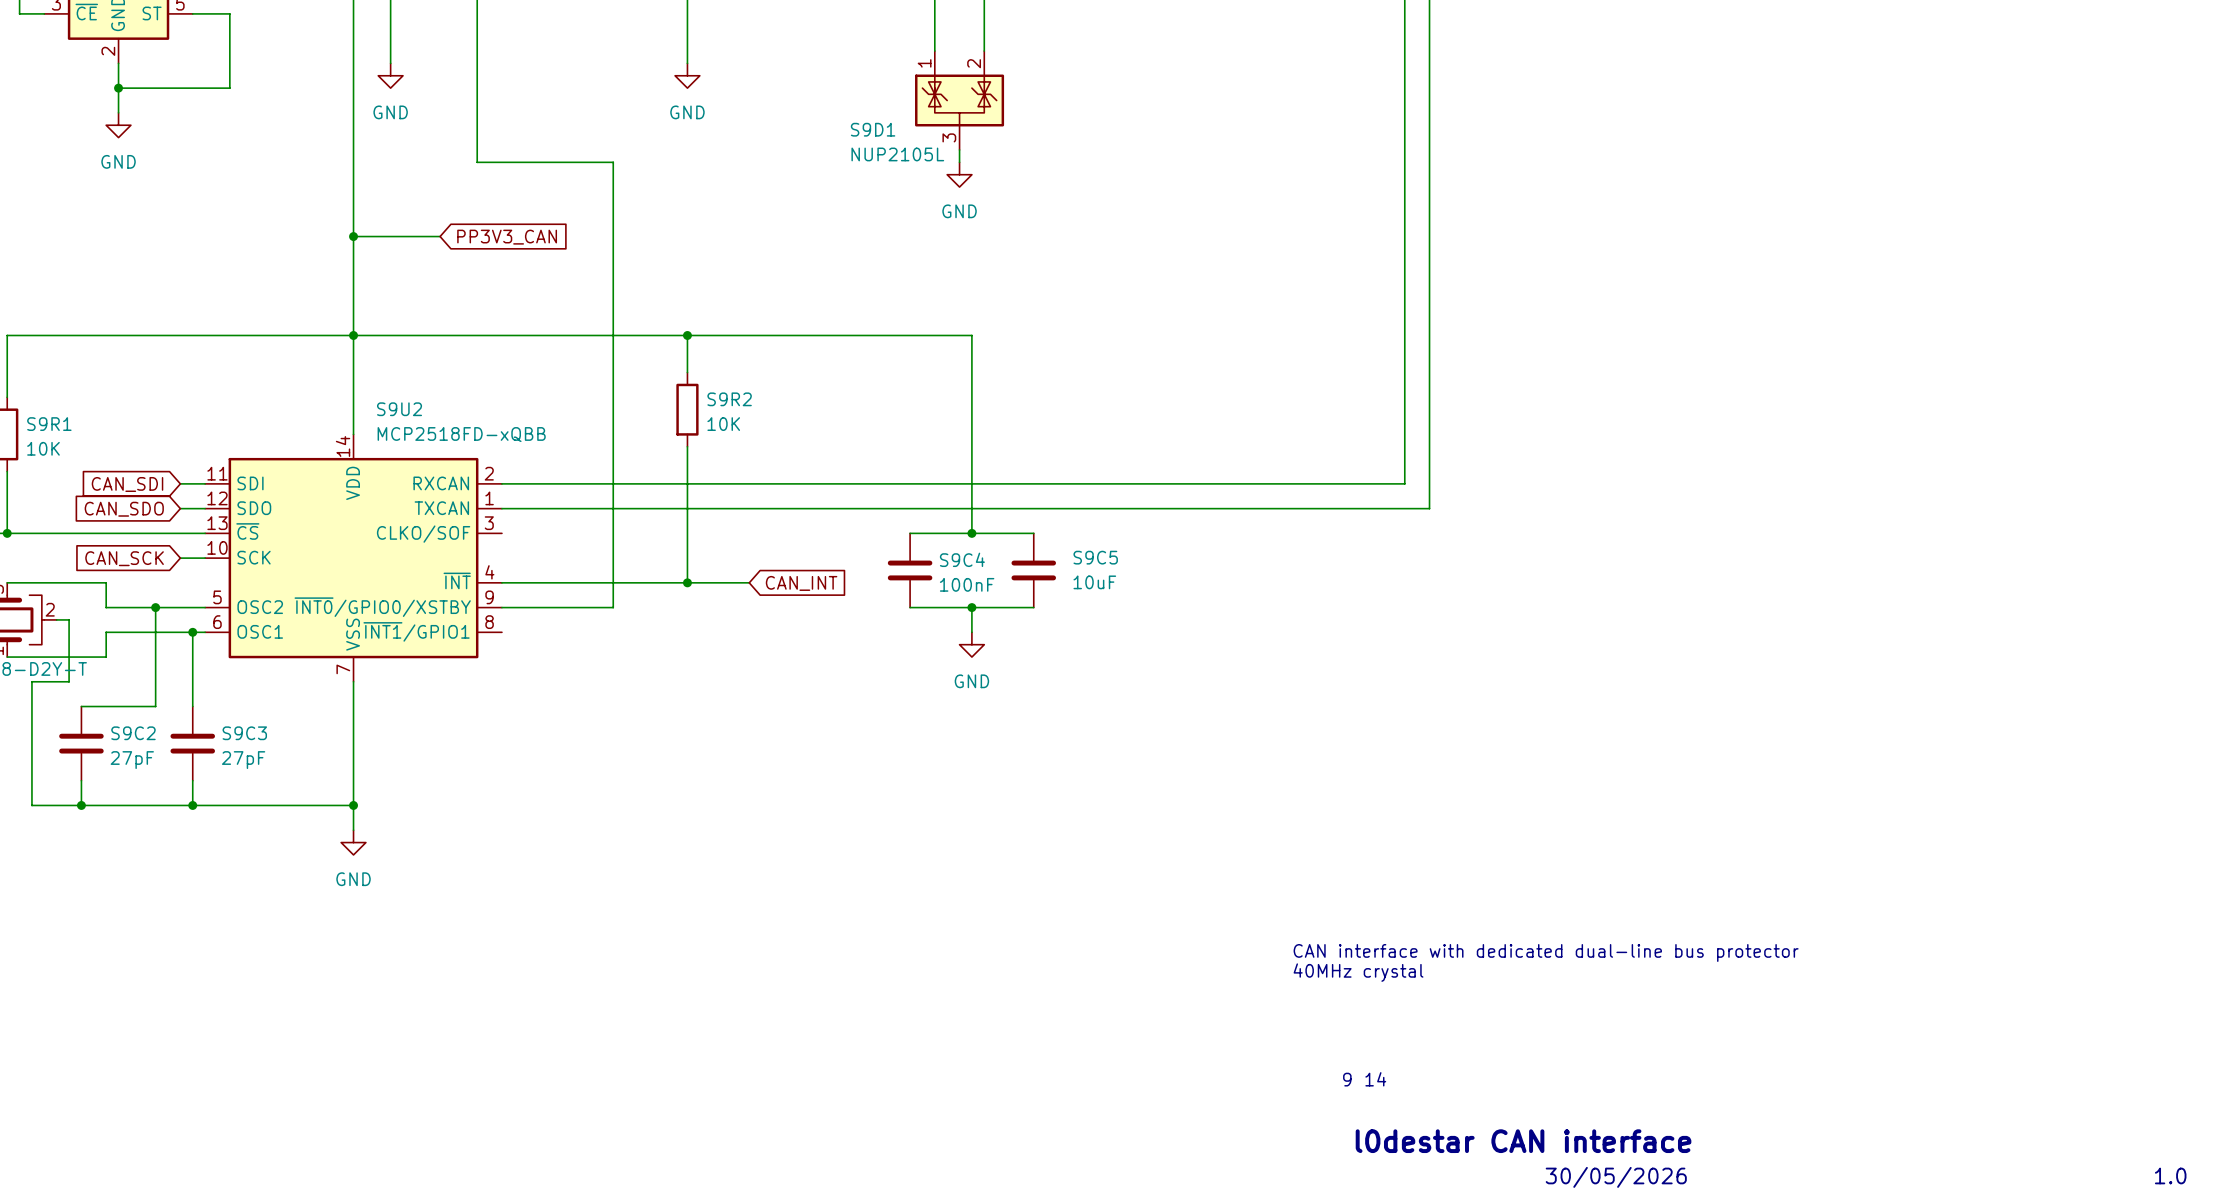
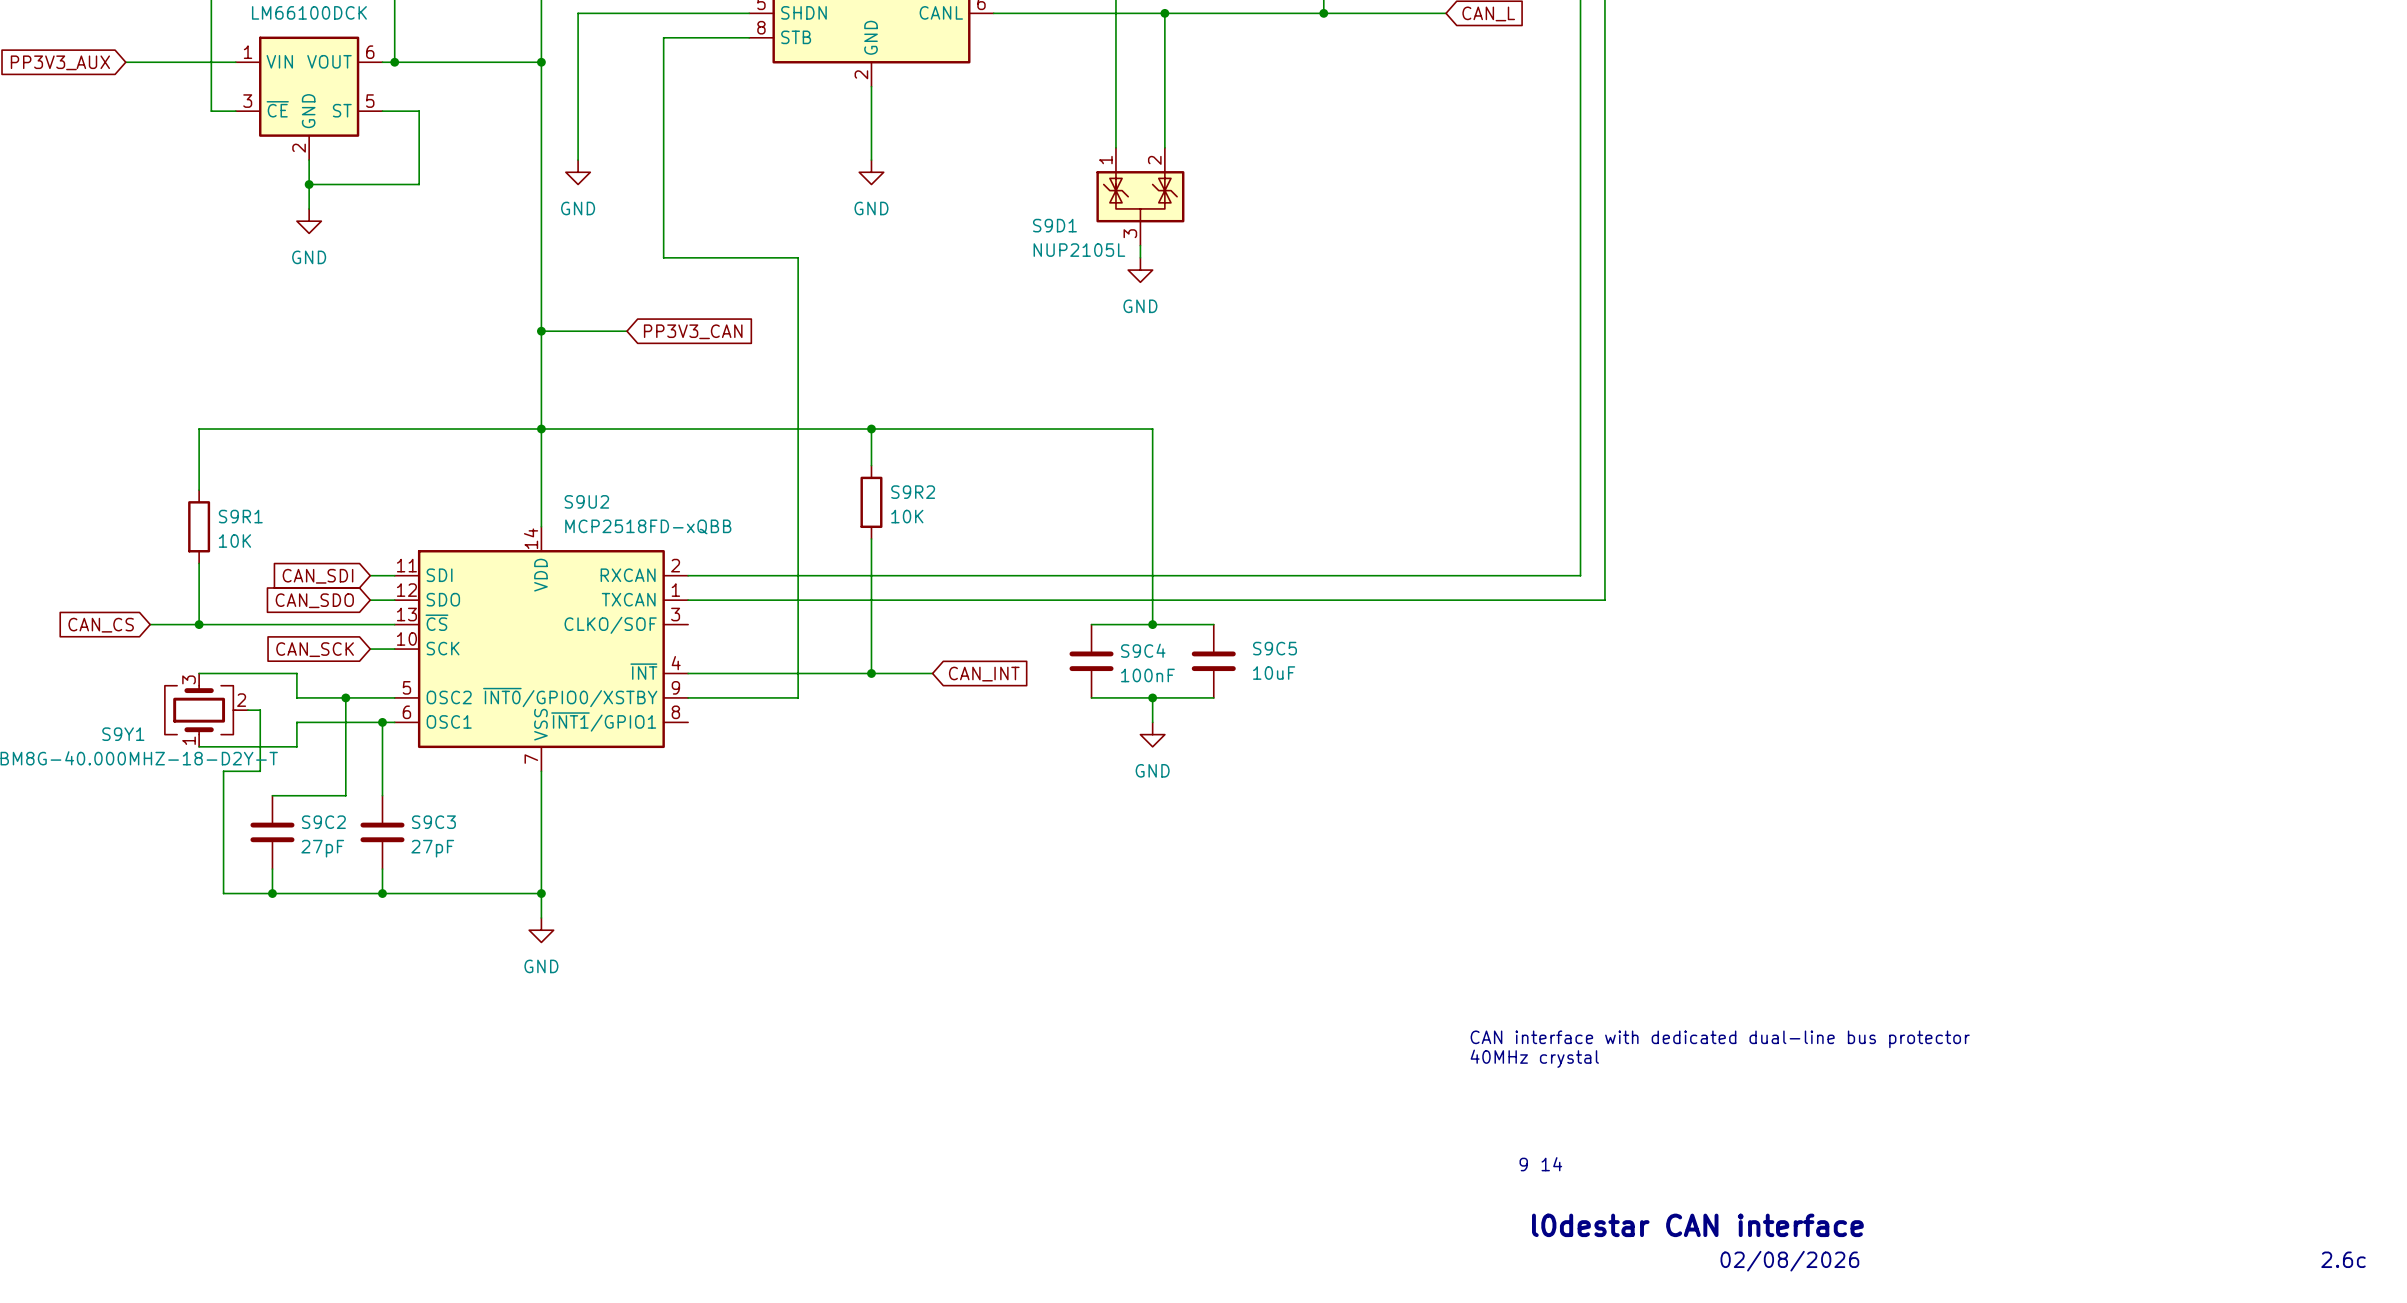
text: 1.0 (2170, 1175) -> 2.6c (2343, 1259)
text: 30/05/2026 (1616, 1177) -> 02/08/2026 (1789, 1261)

